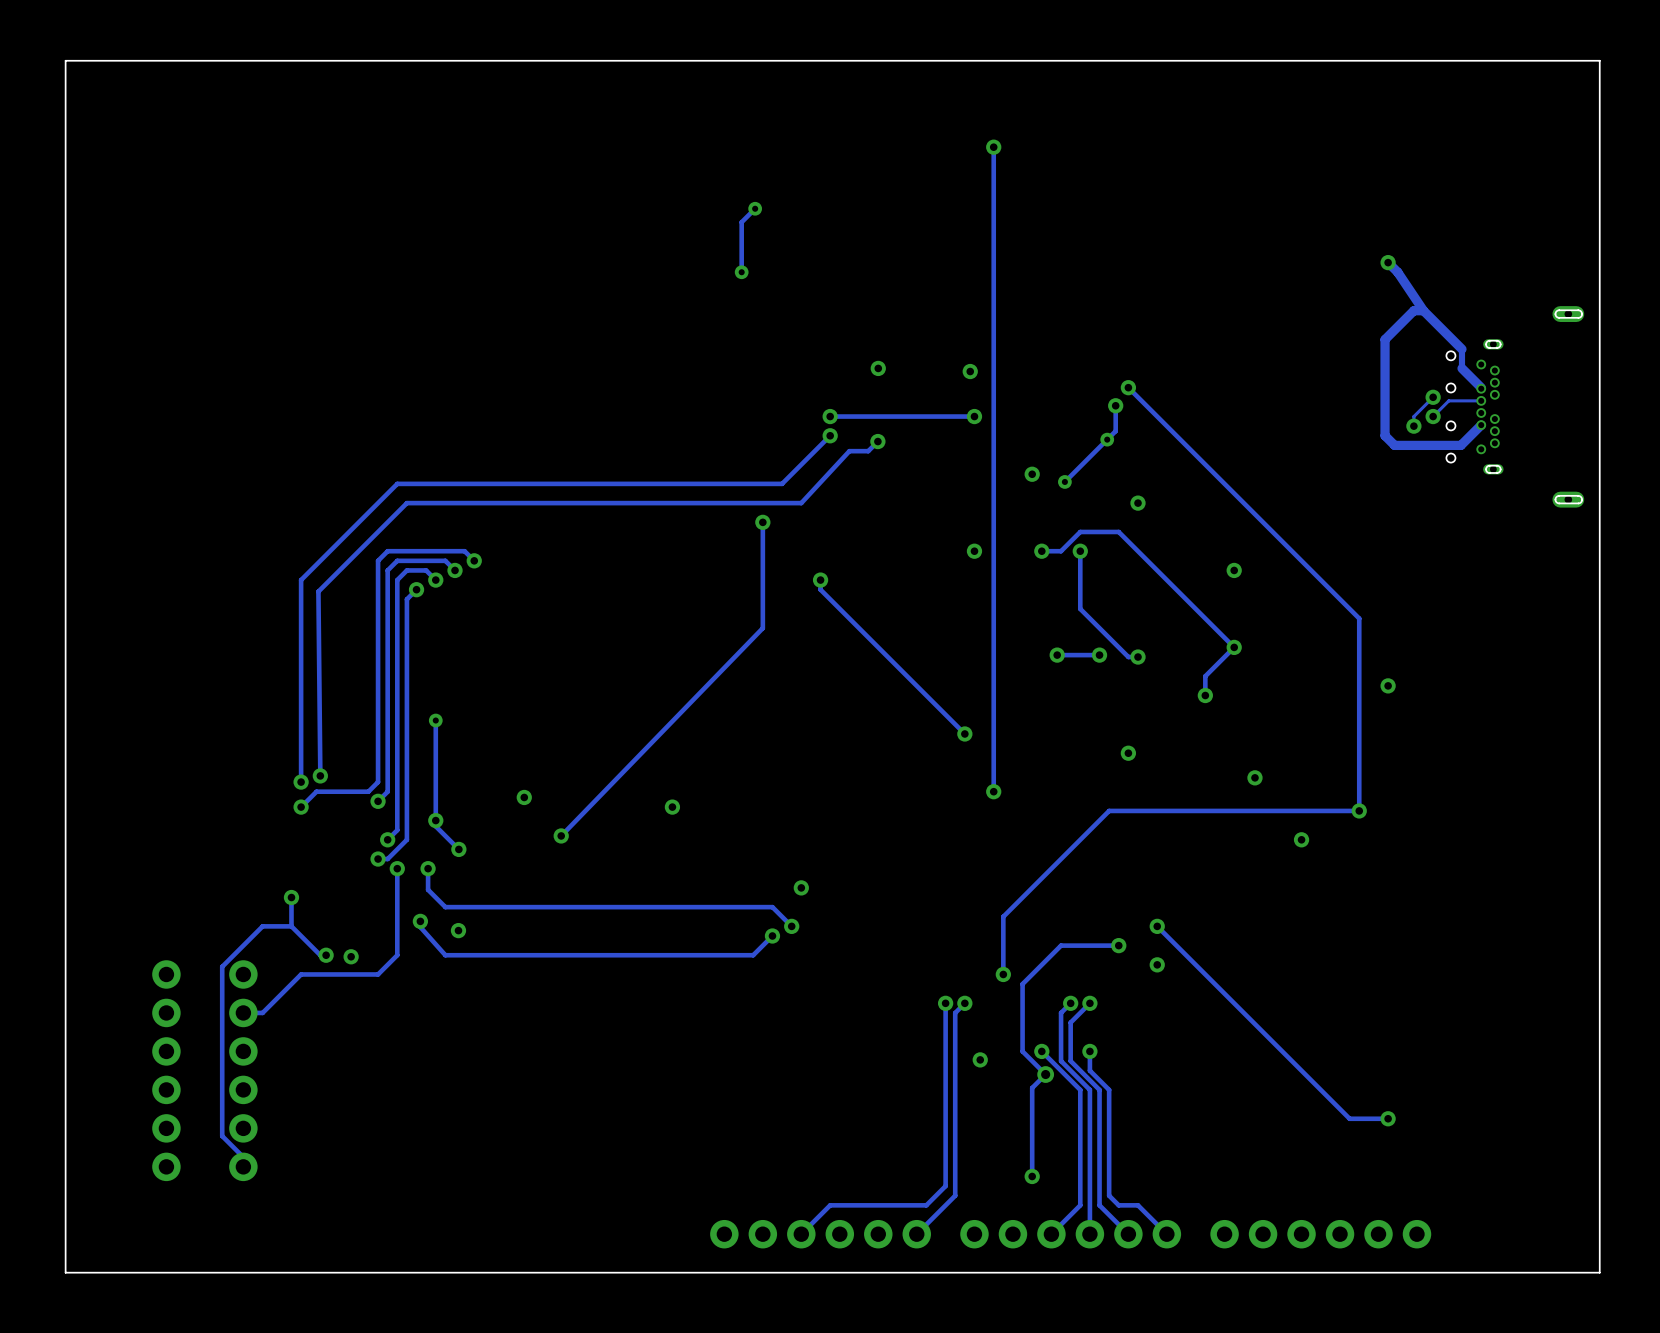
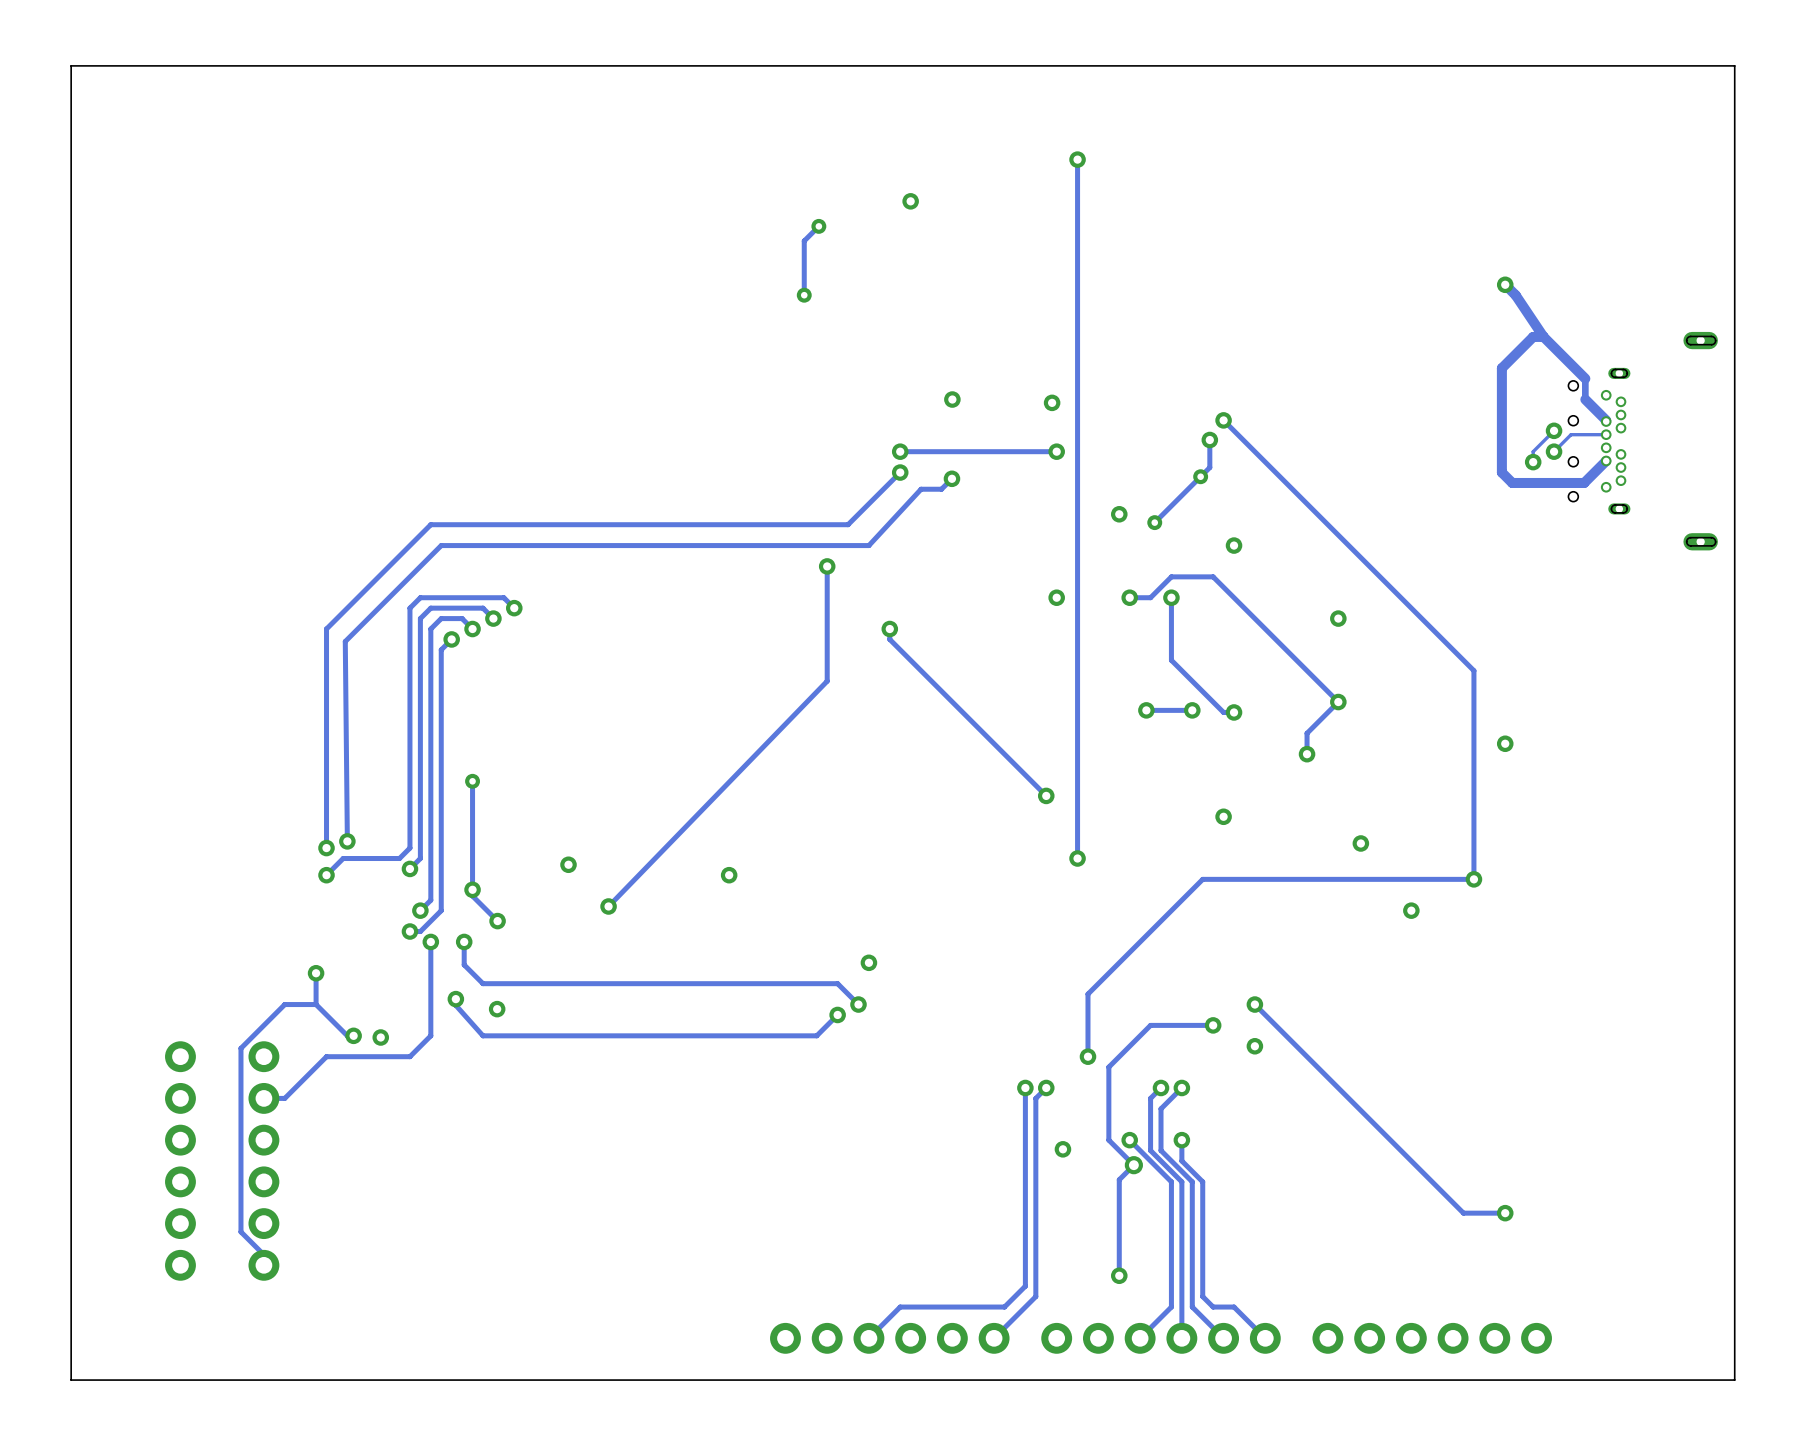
via: none -> (910, 201)

